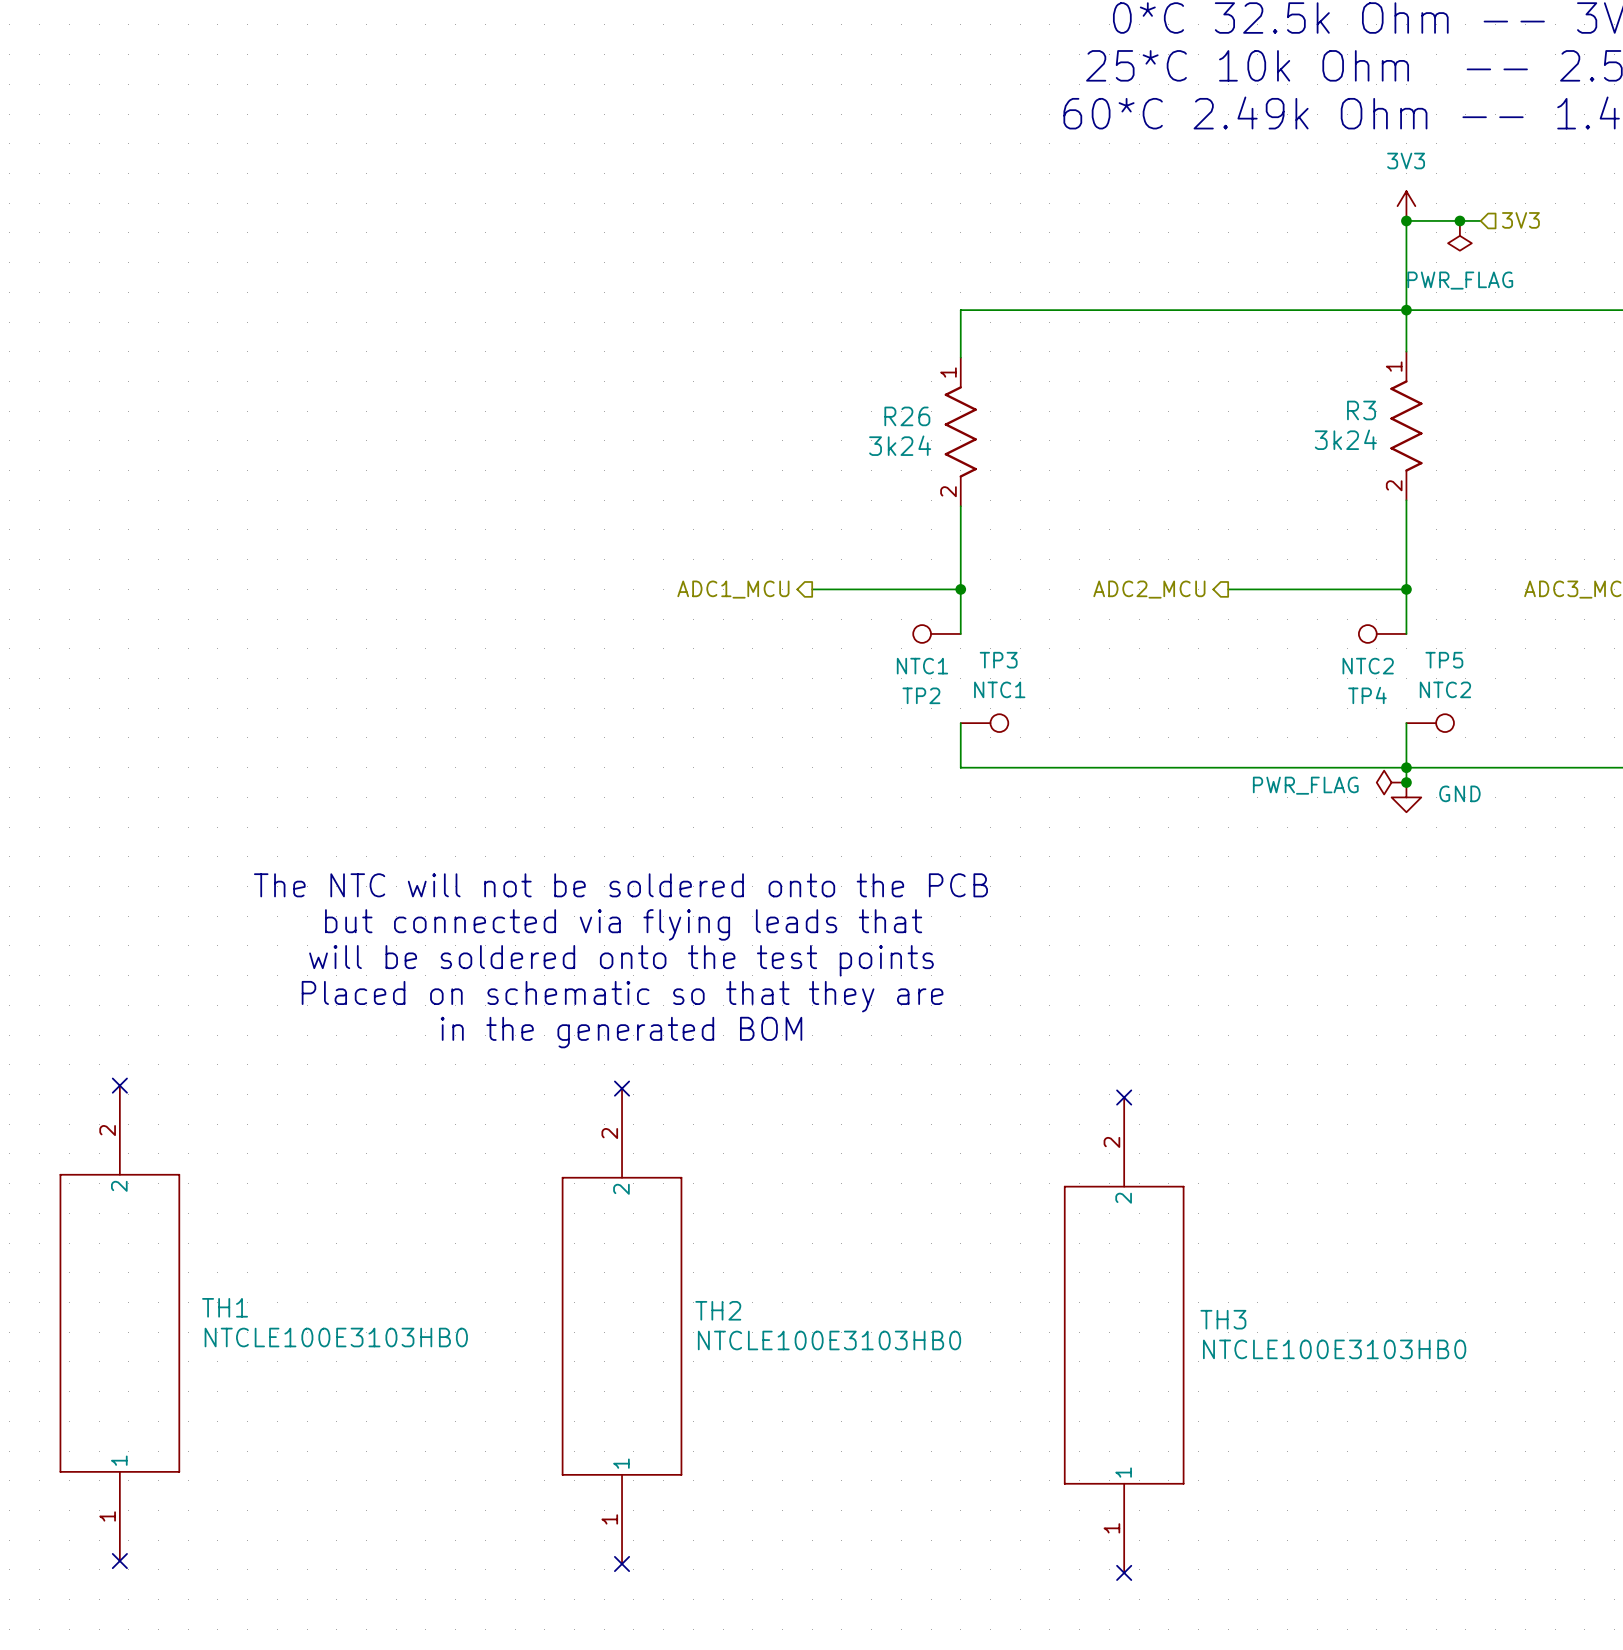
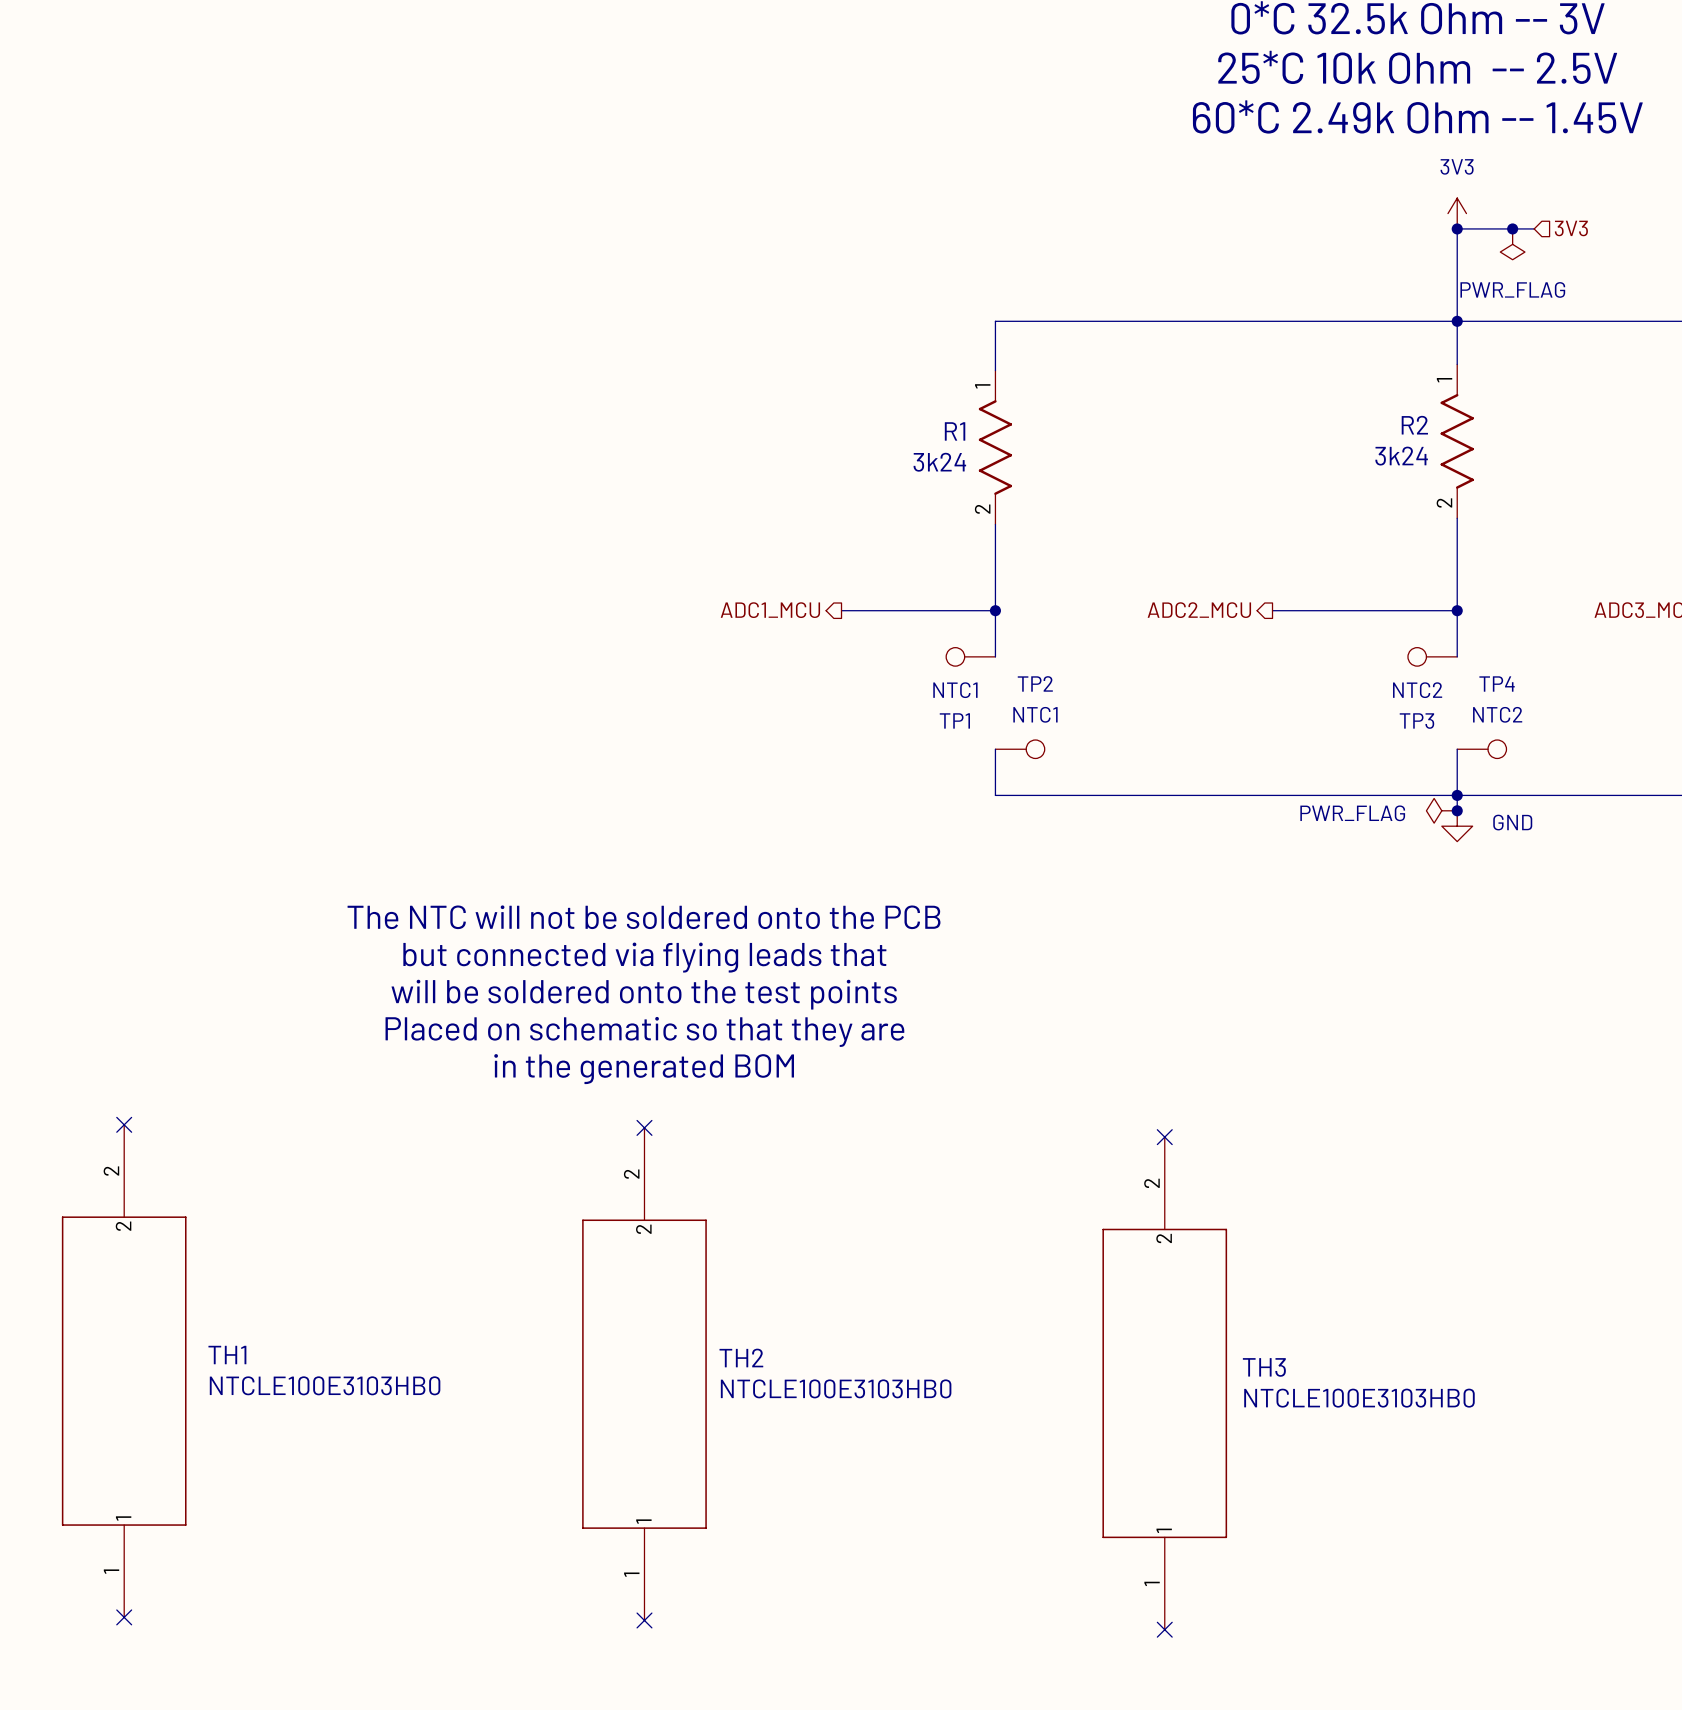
R3 name: R3 (1361, 410) -> R2 (1414, 425)
R26 name: R26 (907, 416) -> R1 (955, 431)
TP3 name: TP3 (998, 660) -> TP2 (1035, 683)
TP5 name: TP5 (1444, 660) -> TP4 (1497, 684)
TP2 name: TP2 (921, 695) -> TP1 (954, 720)
TP4 name: TP4 (1367, 695) -> TP3 (1416, 721)

